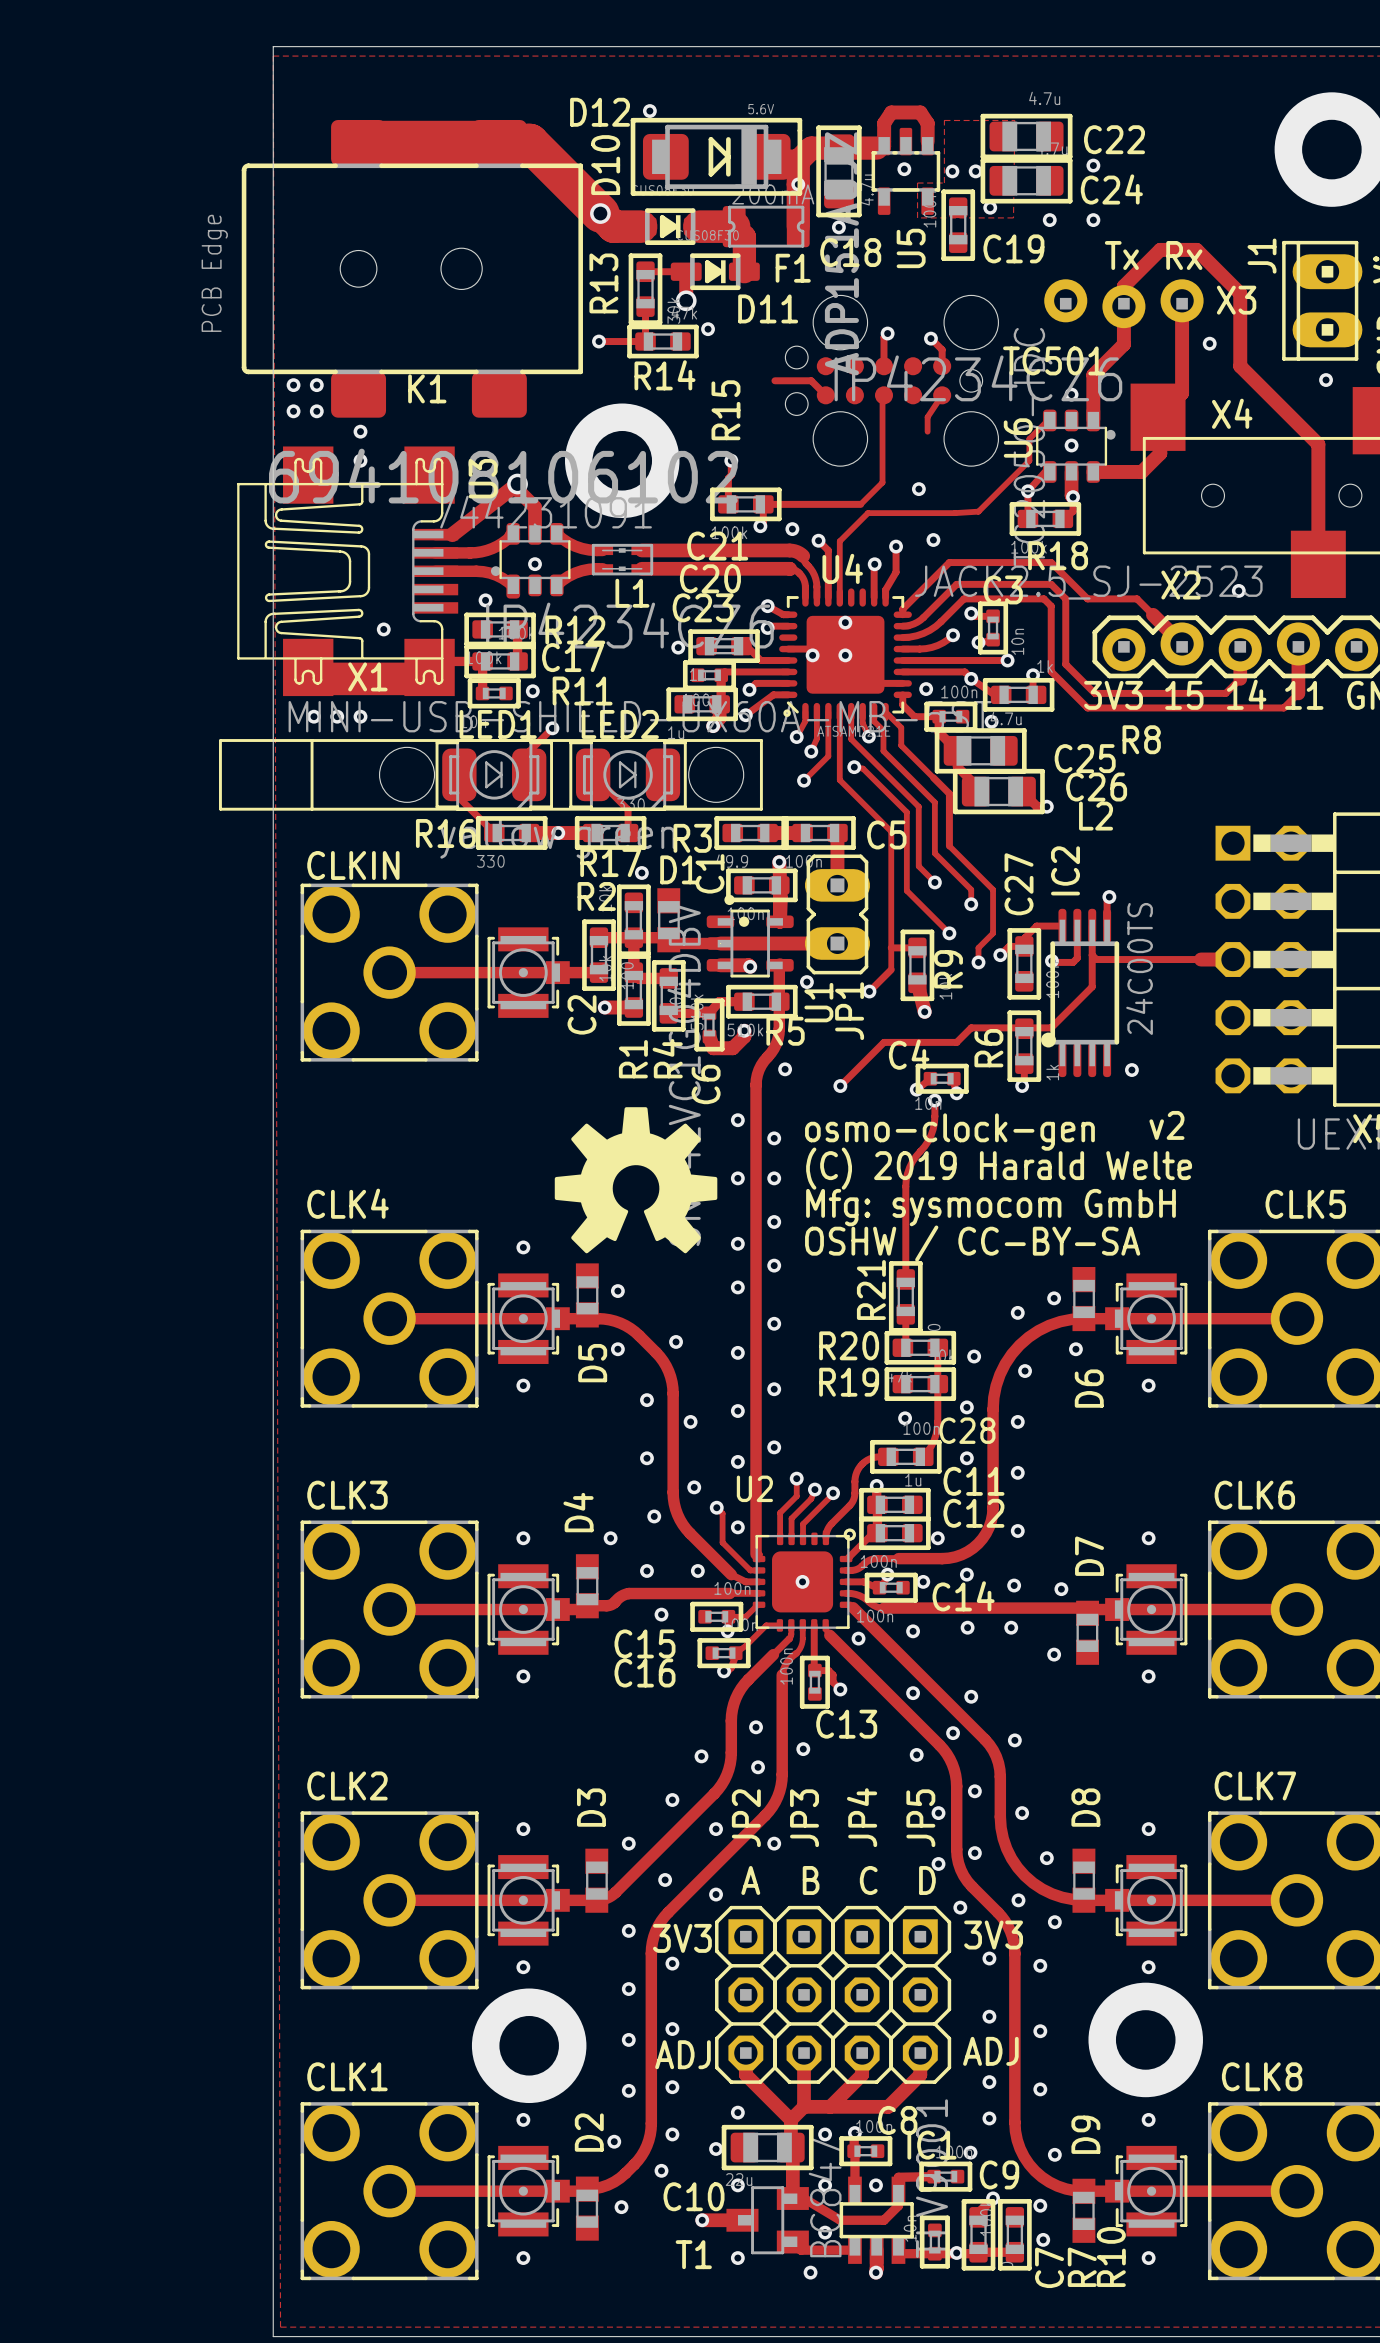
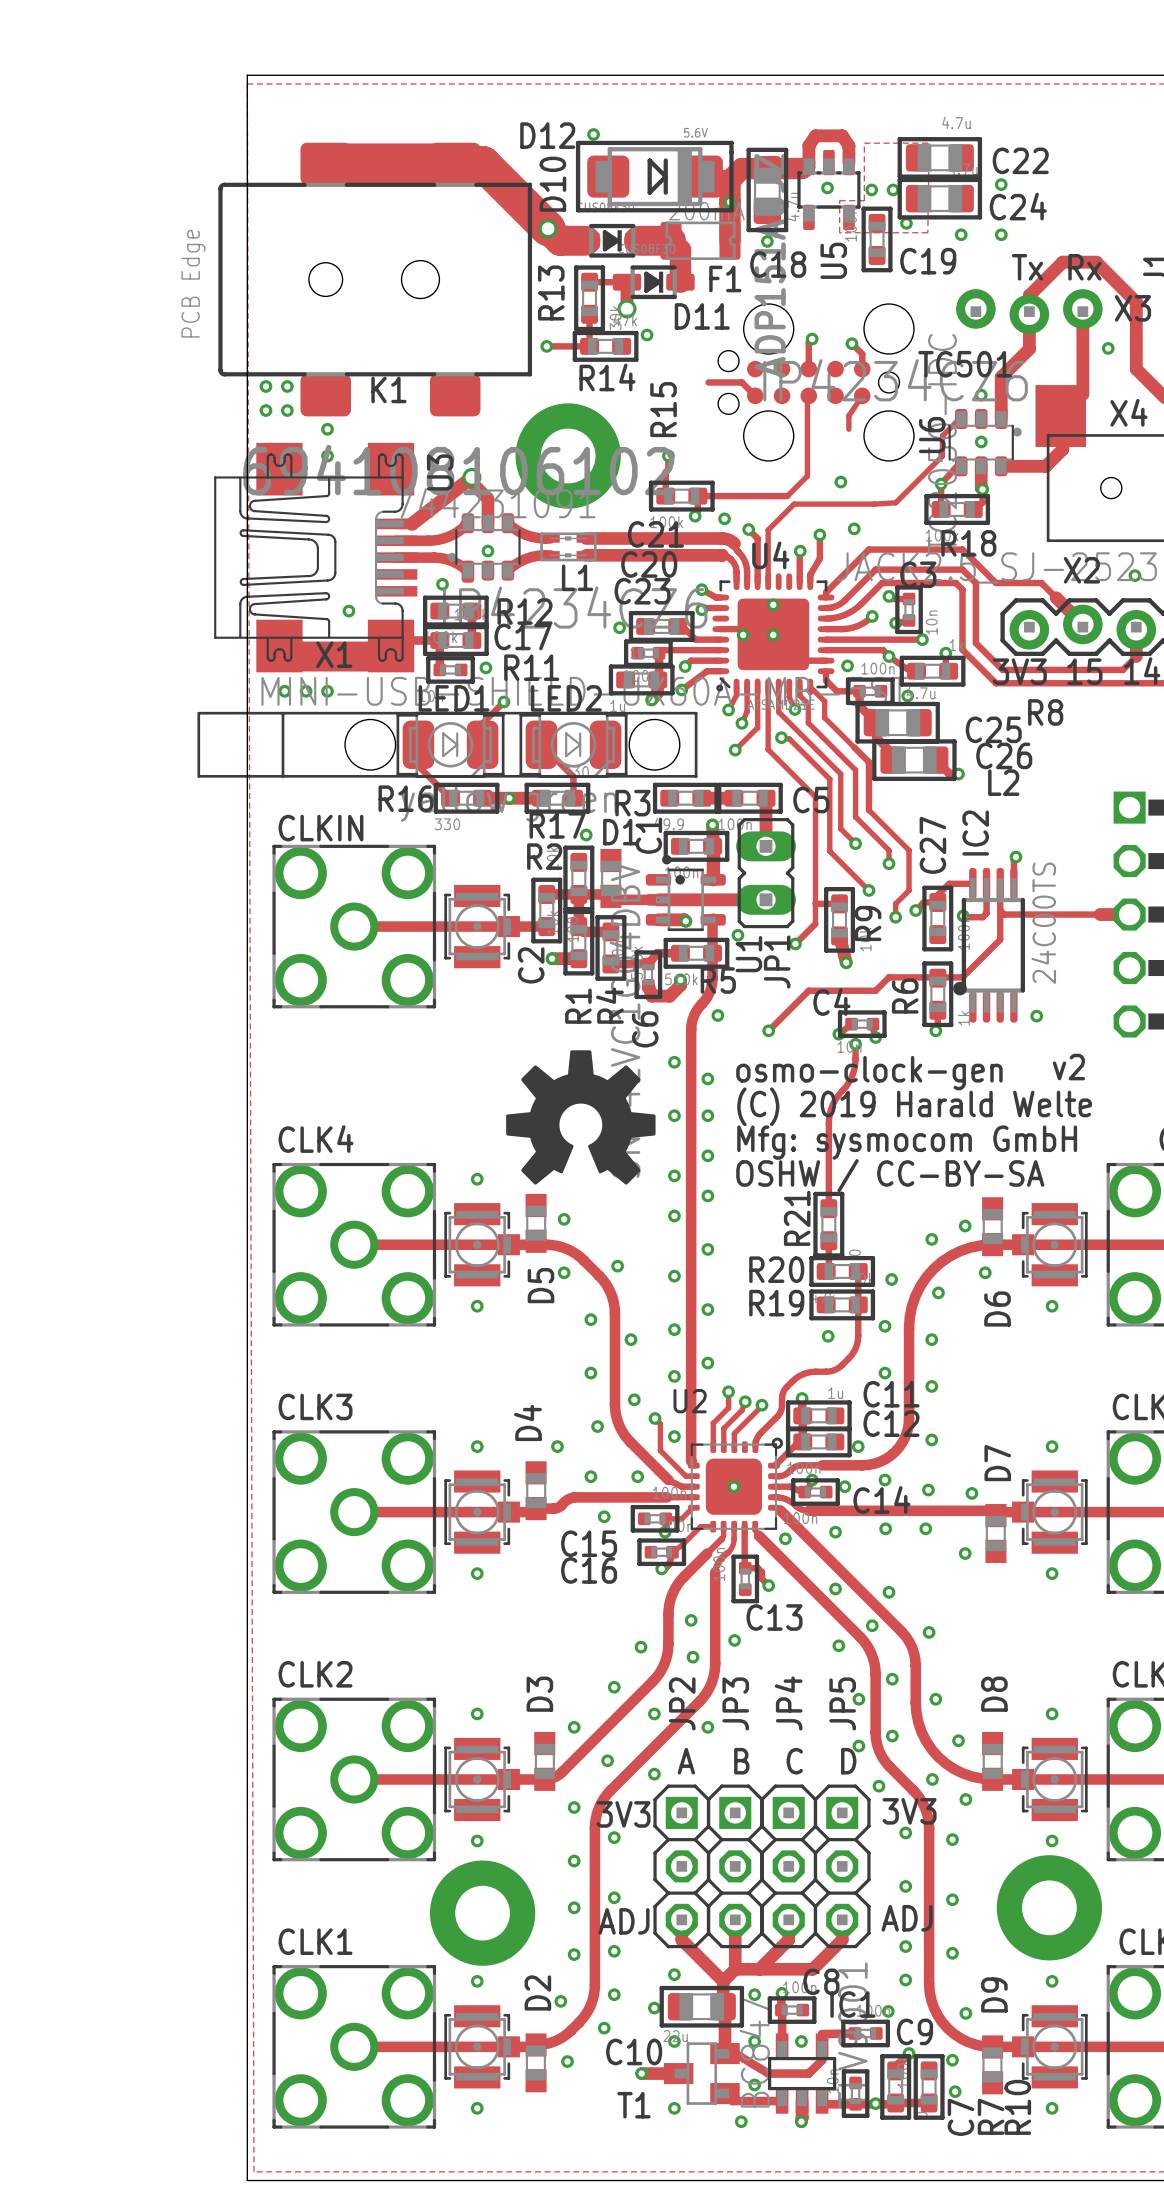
track: (937, 1417) (934, 1440) (923, 1456) -> none
track: (888, 1456) (873, 1457) (864, 1461) (856, 1472) (854, 1485) -> (858, 1335) (853, 1351) (839, 1367) (831, 1370) (811, 1372) (799, 1376) (785, 1388) (782, 1398)
C28: 100n (905, 1456) -> none

